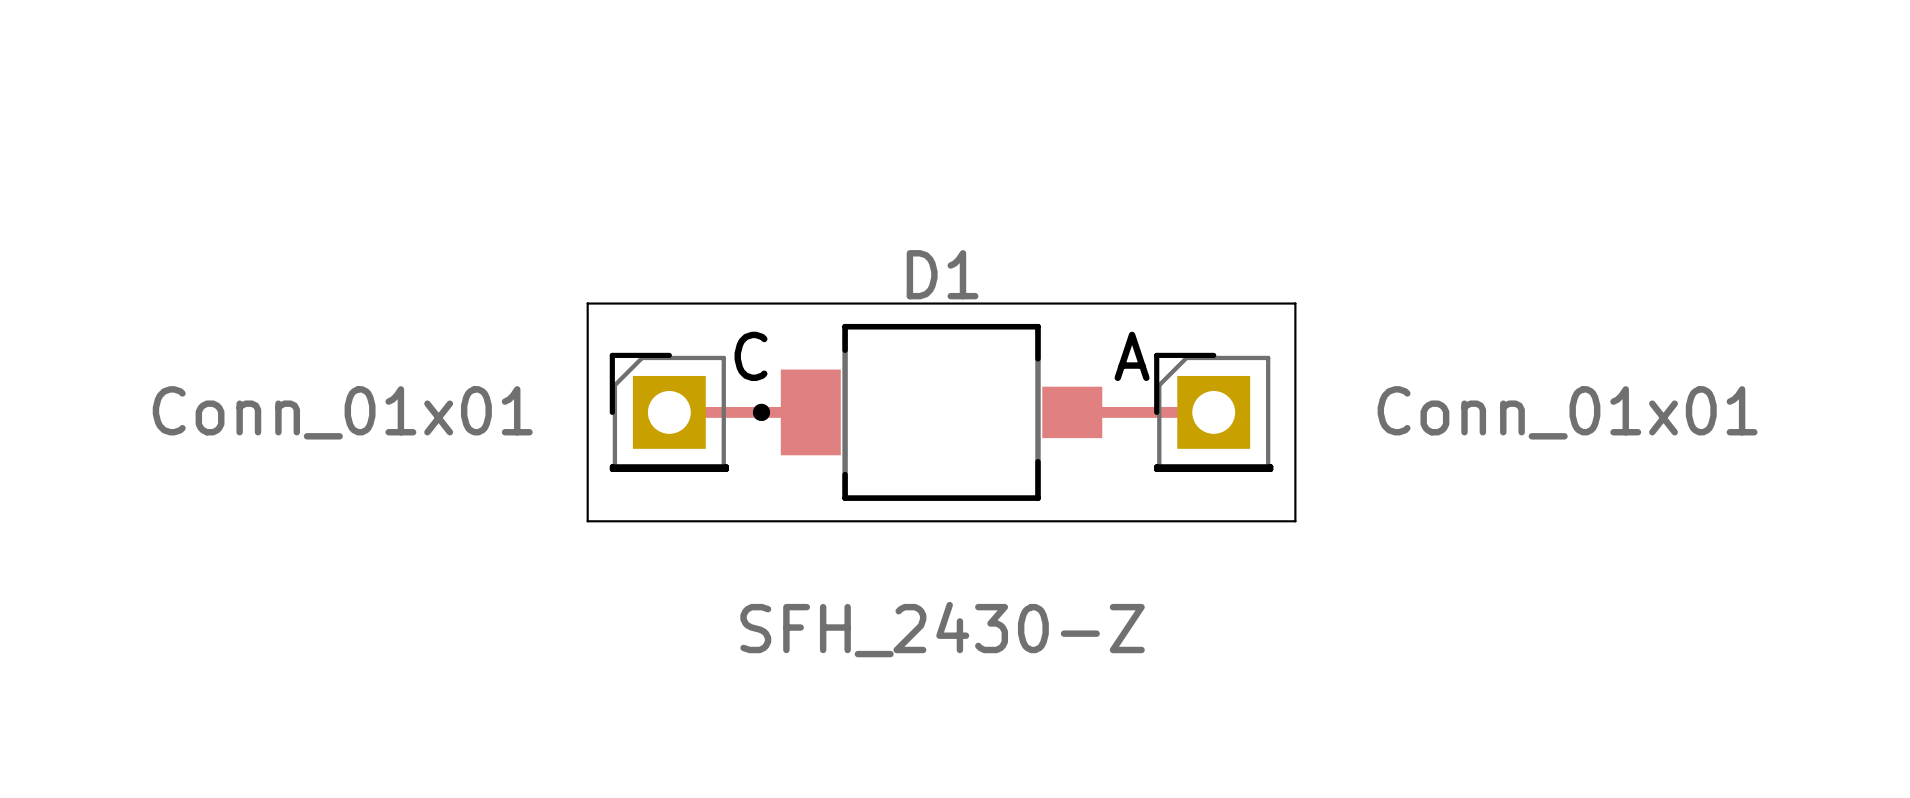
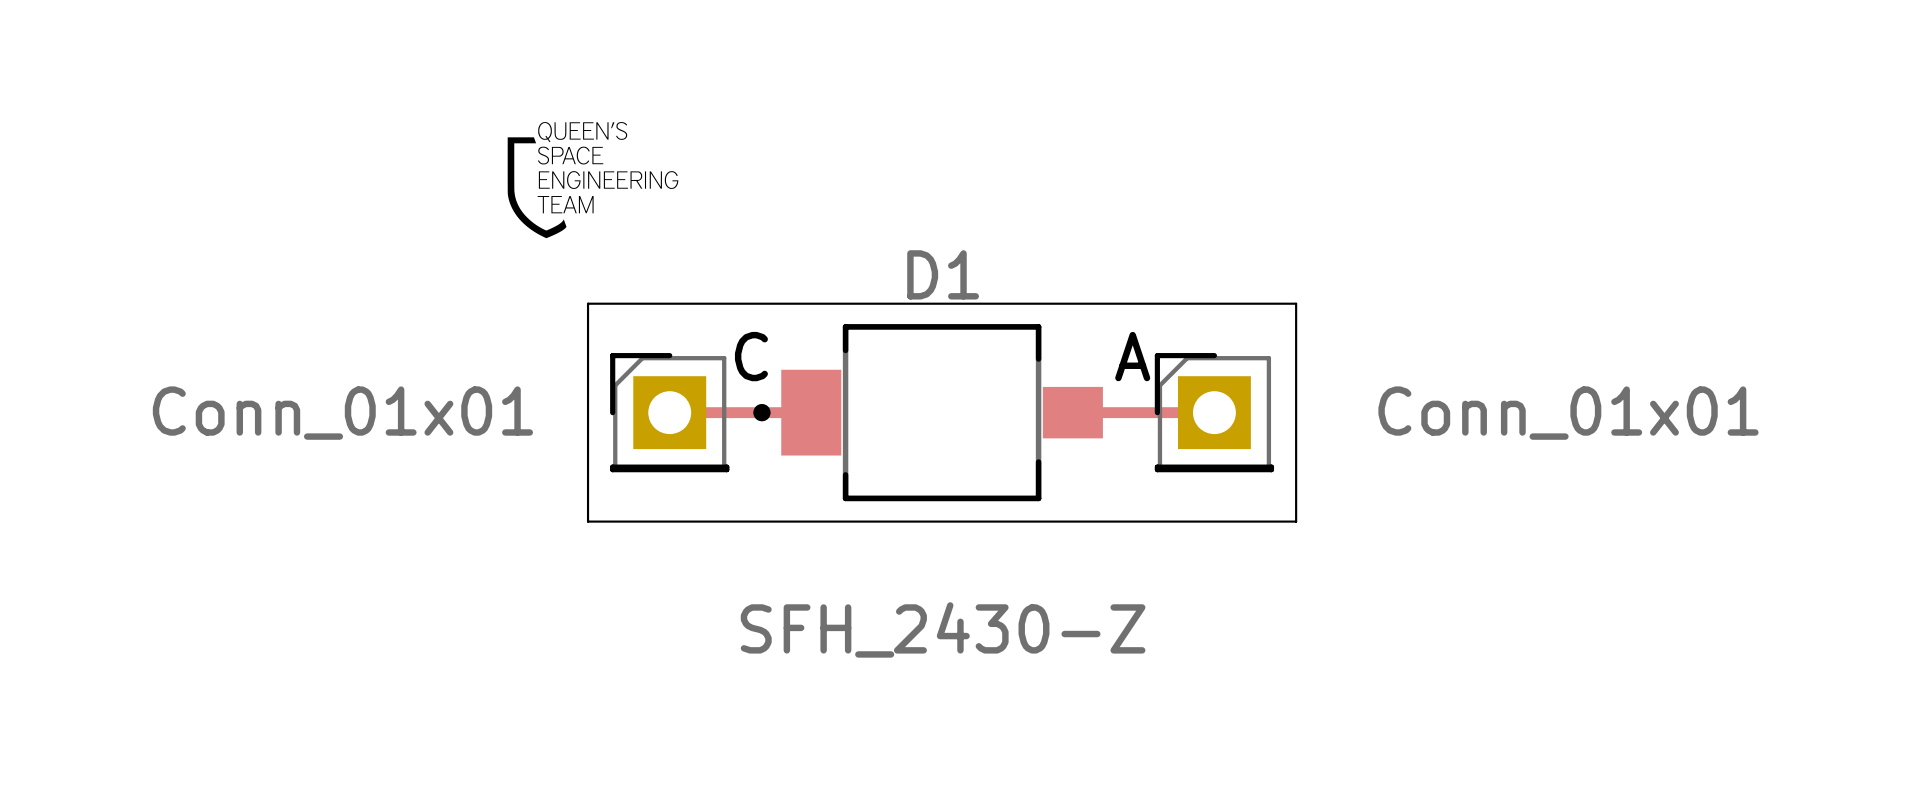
drawing: none -> [507, 122, 679, 239]

